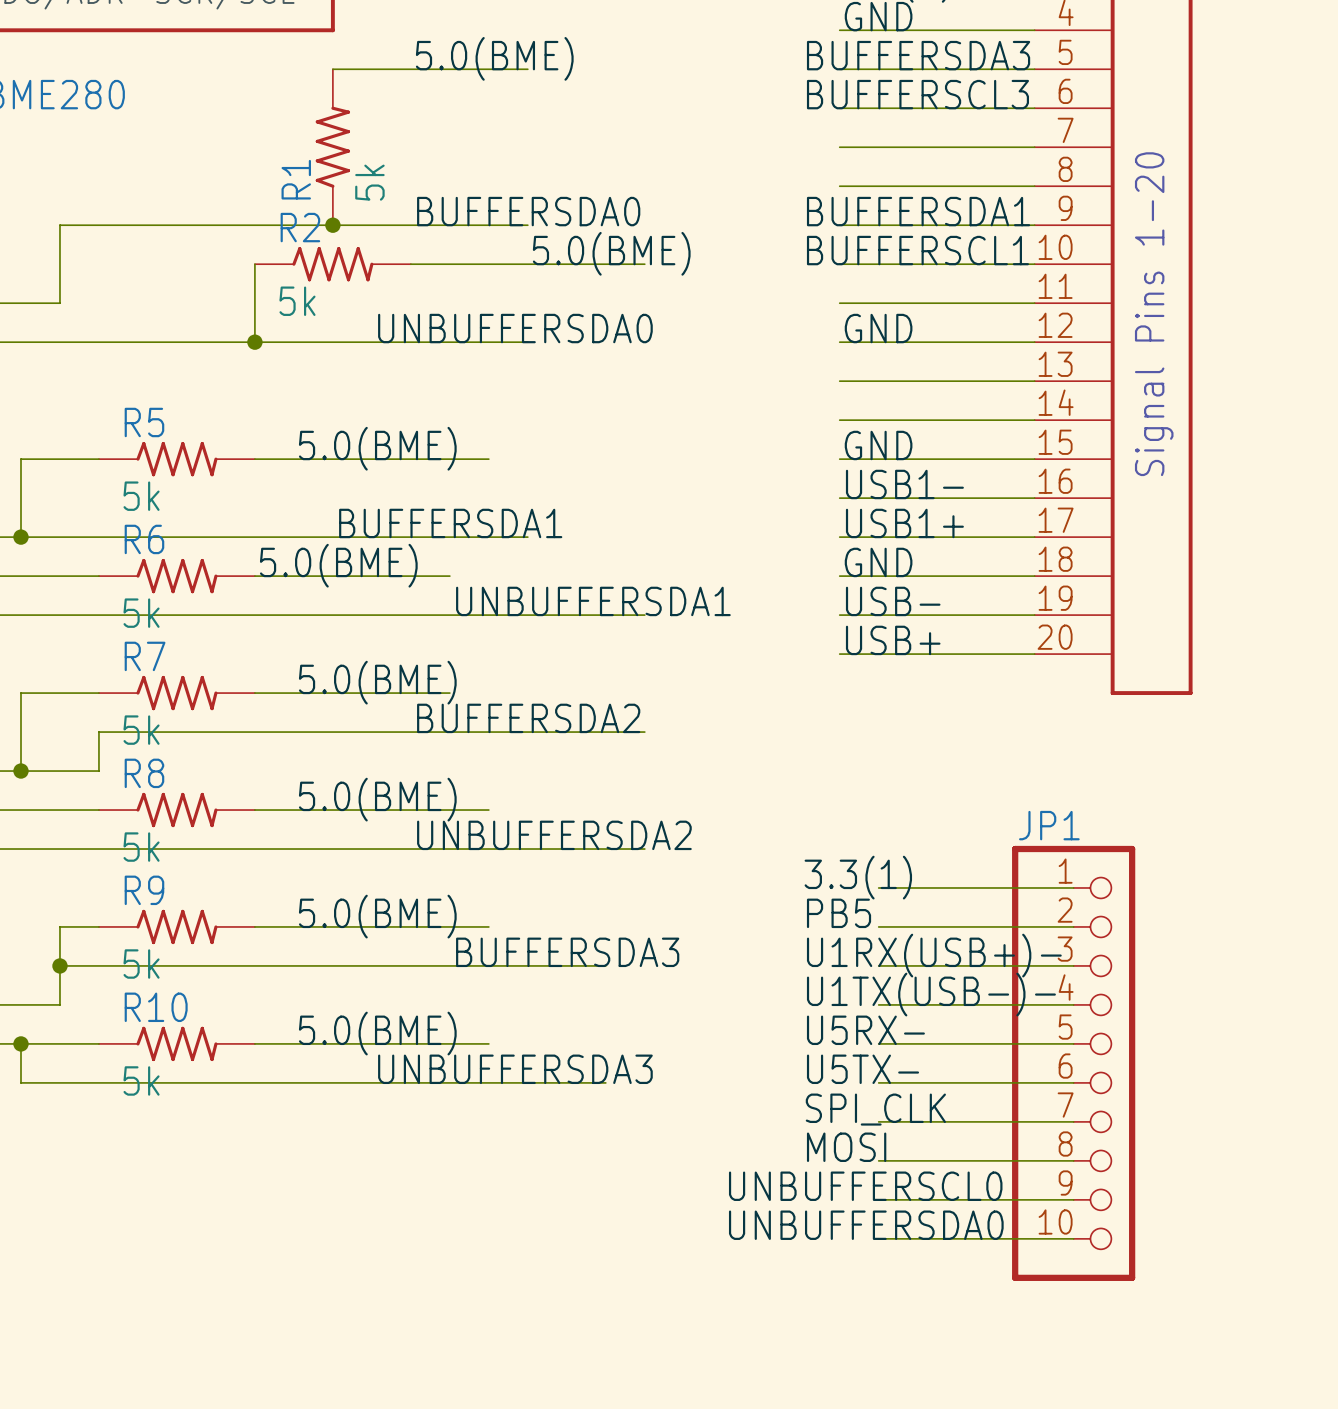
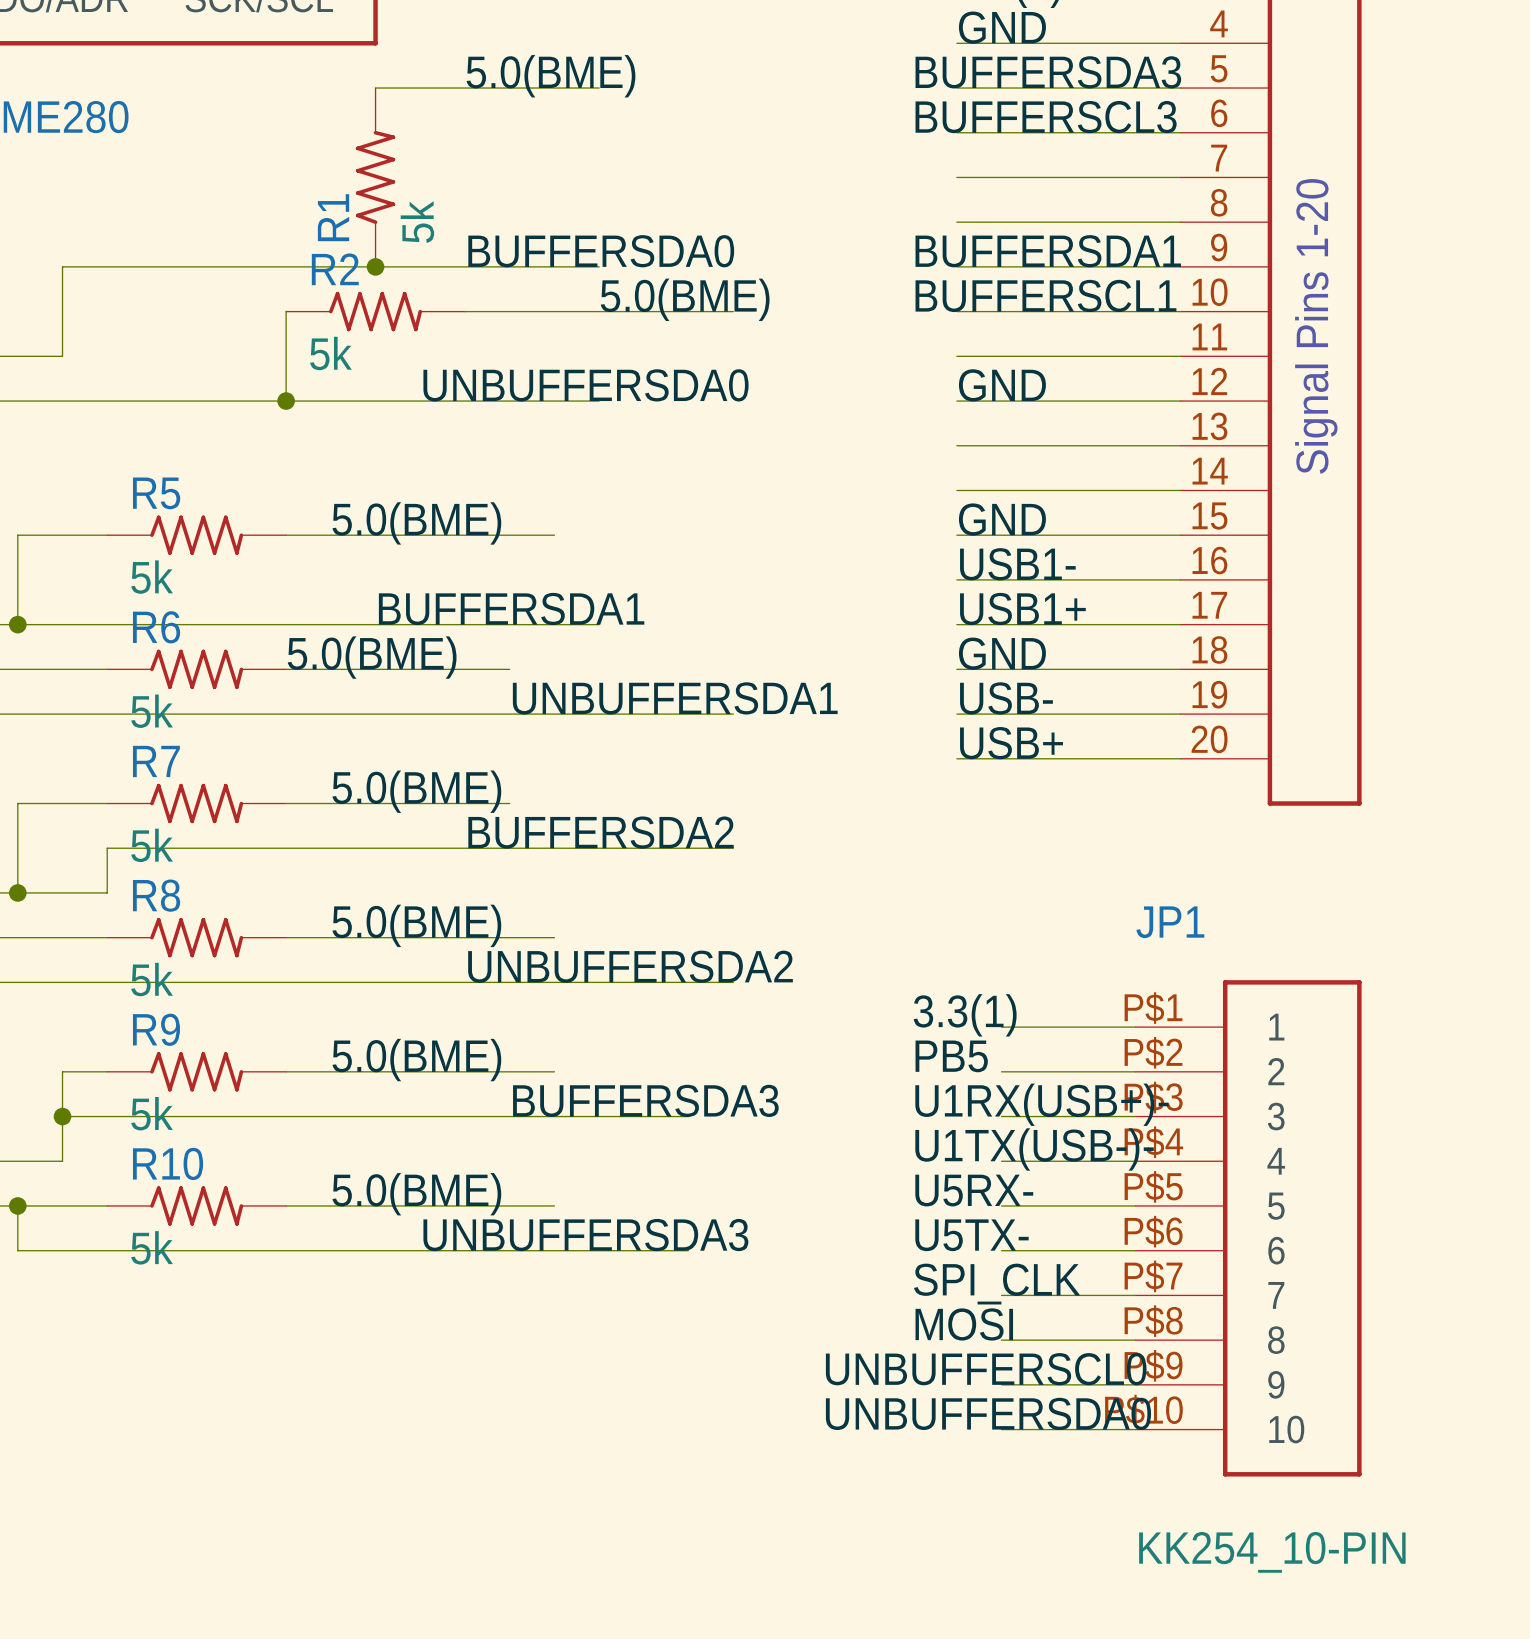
JP1 name position: JP1 (1049, 825) -> JP1 (1170, 922)
JP1 symbol: [1012, 845, 1136, 1281] -> [1135, 980, 1362, 1477]
JP1 value: none -> KK254_10-PIN (1272, 1552)

